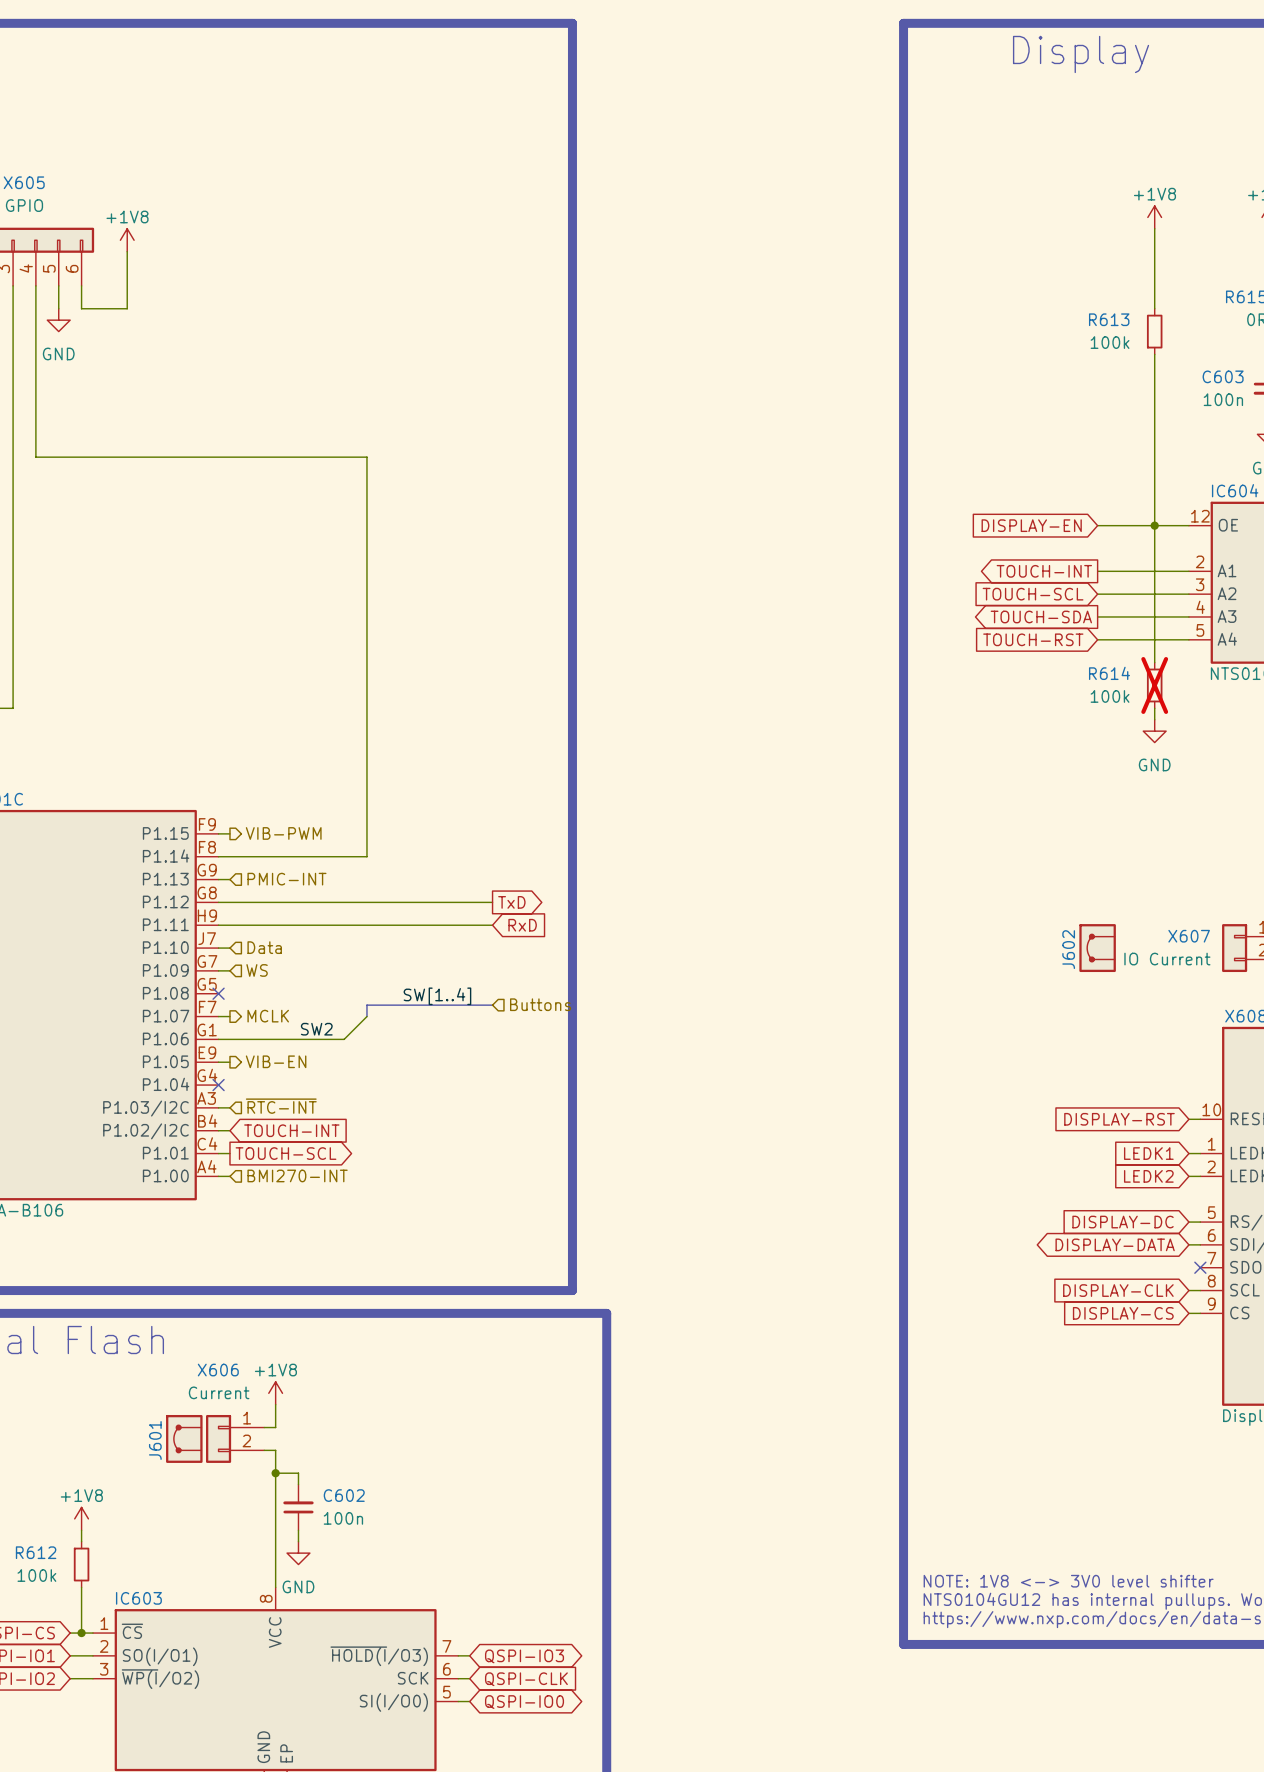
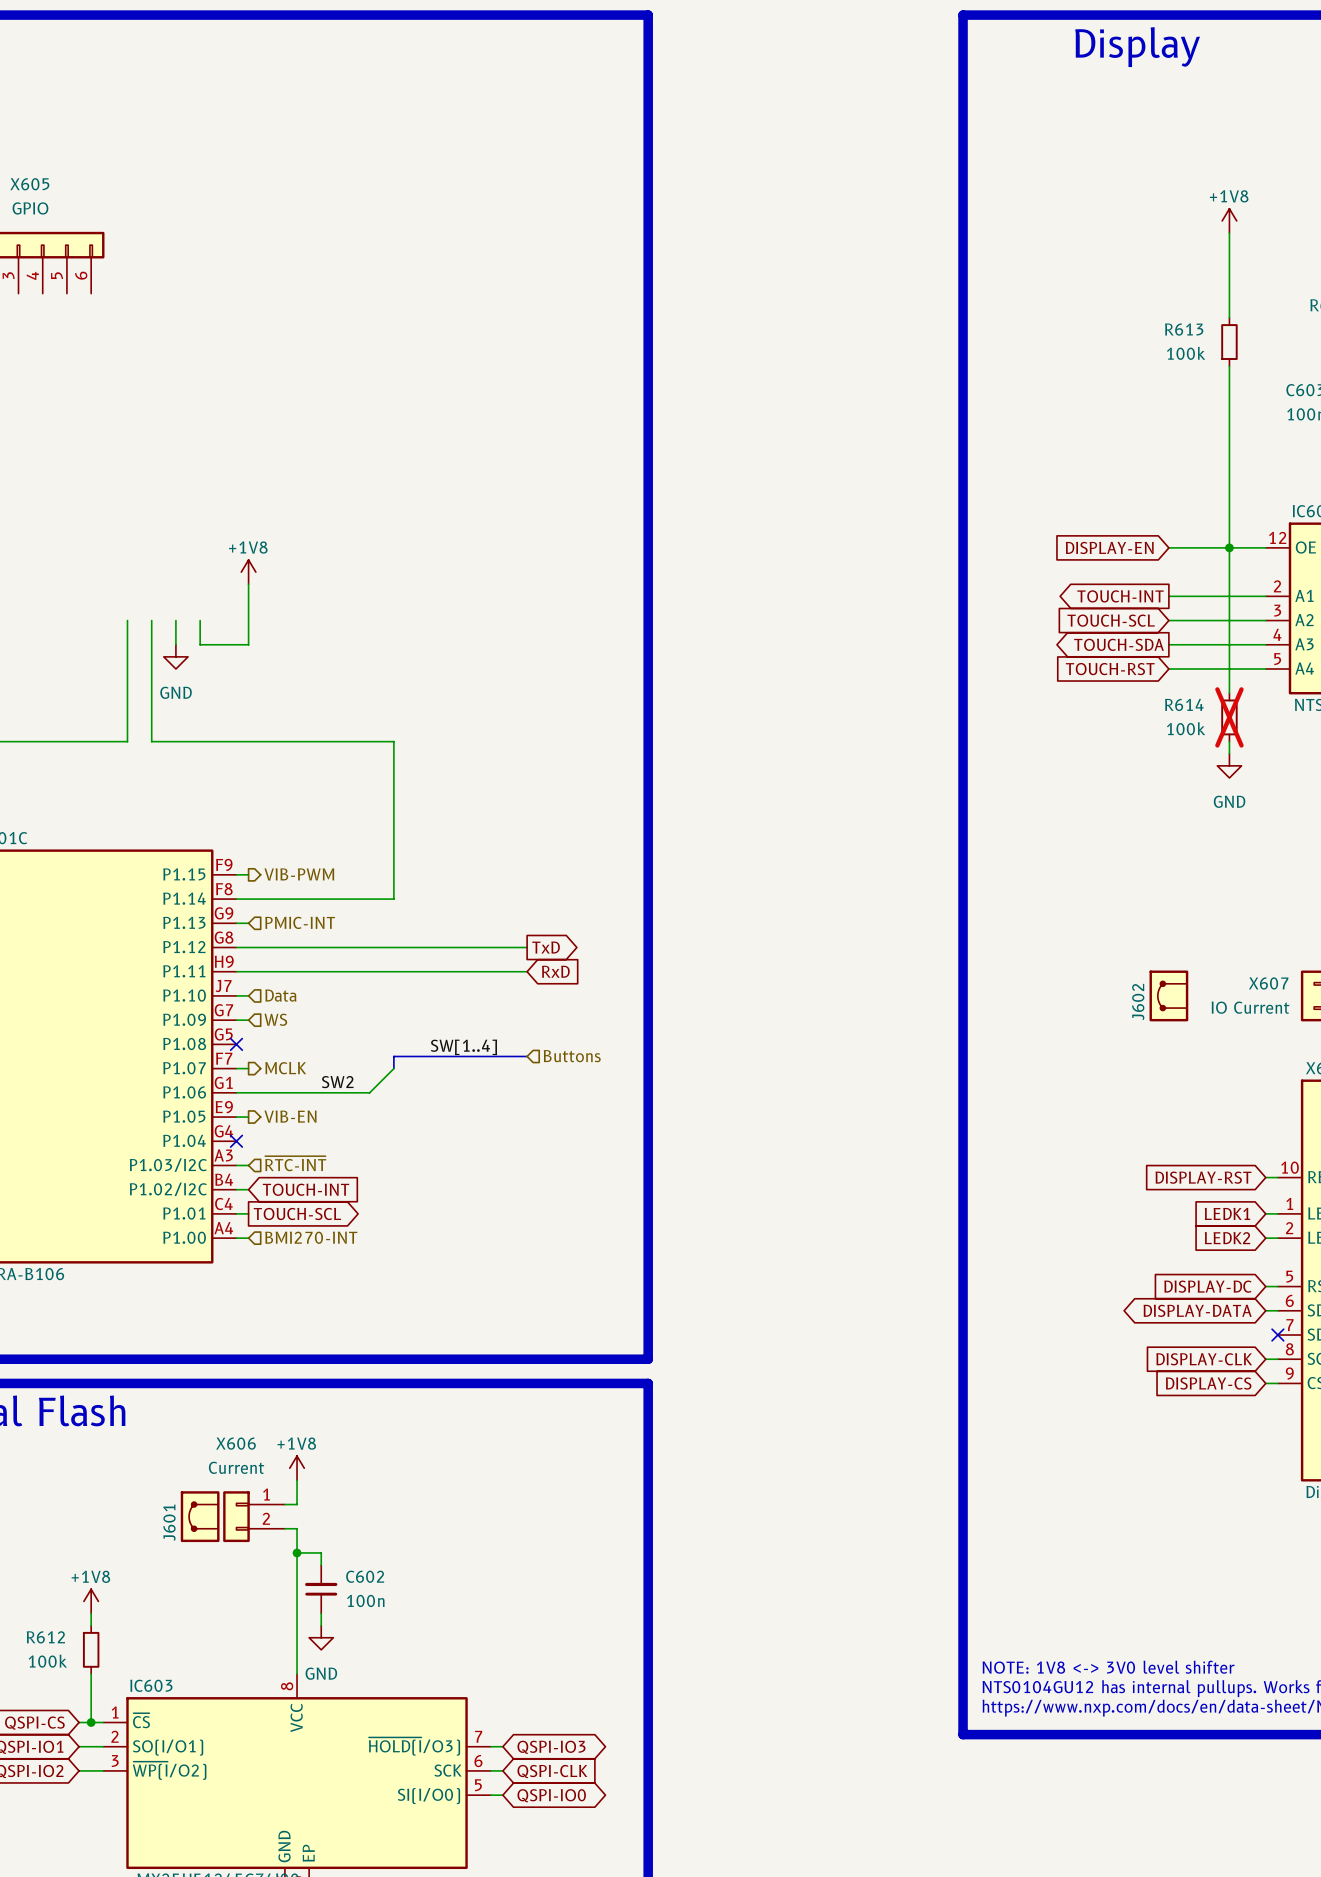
line: (572, 23) (572, 1290) -> (611, 15) (648, 15) (648, 1359) (611, 1359)
power symbol: +1V8 (127, 240) -> none
wire: (127, 251) (127, 308) (81, 308) (81, 285) -> none
wire: (13, 285) (13, 708) -> (127, 620) (127, 741) (18, 741)
wire: (35, 285) (35, 457) (366, 457) (366, 708) -> (151, 620) (151, 741) (393, 741)
wire: (58, 285) (58, 308) -> none
power symbol: GND (58, 320) -> none
power symbol: none -> +1V8 (248, 572)
wire: none -> (248, 584) (248, 644) (200, 644) (200, 620)
wire: none -> (175, 620) (175, 644)
power symbol: none -> GND (175, 656)

